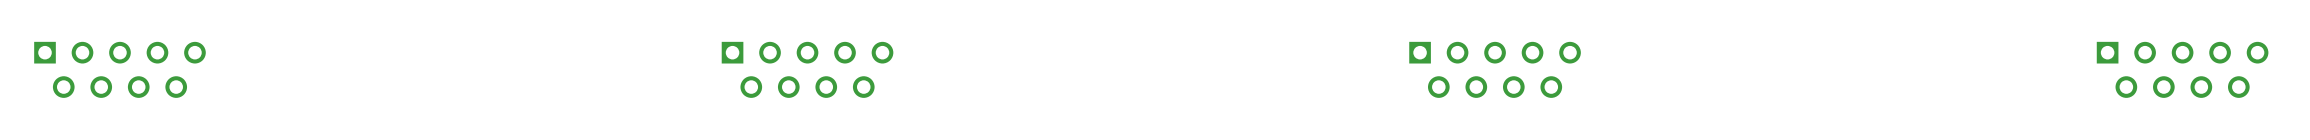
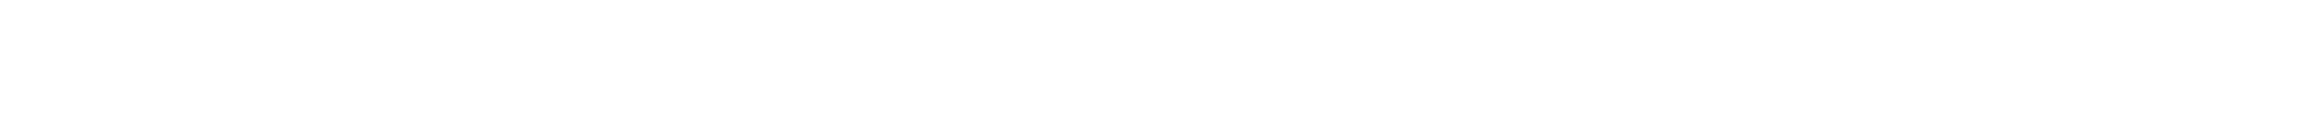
part: (119, 69) -> none
part: (807, 69) -> none
part: (1495, 69) -> none
part: (2182, 69) -> none

